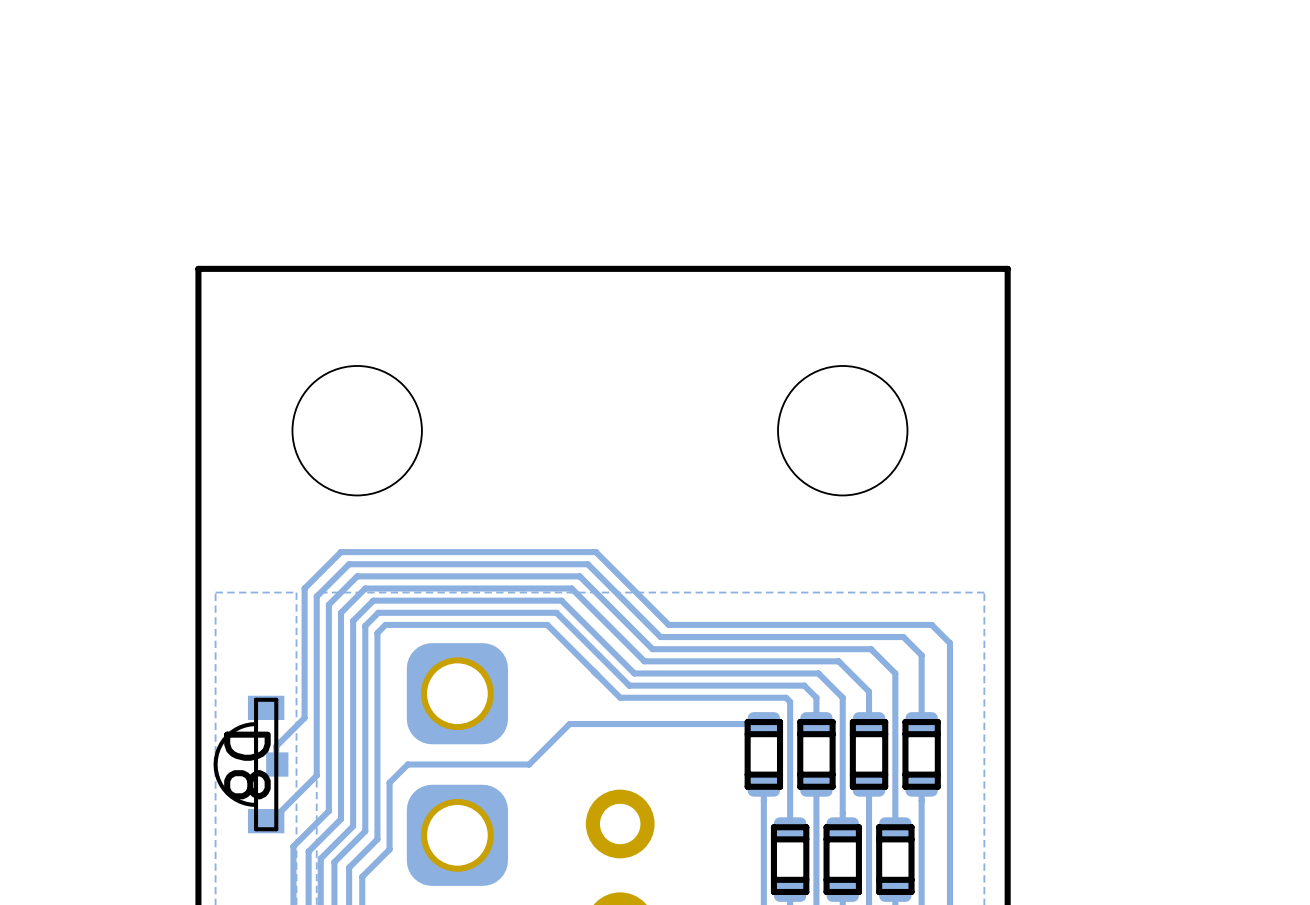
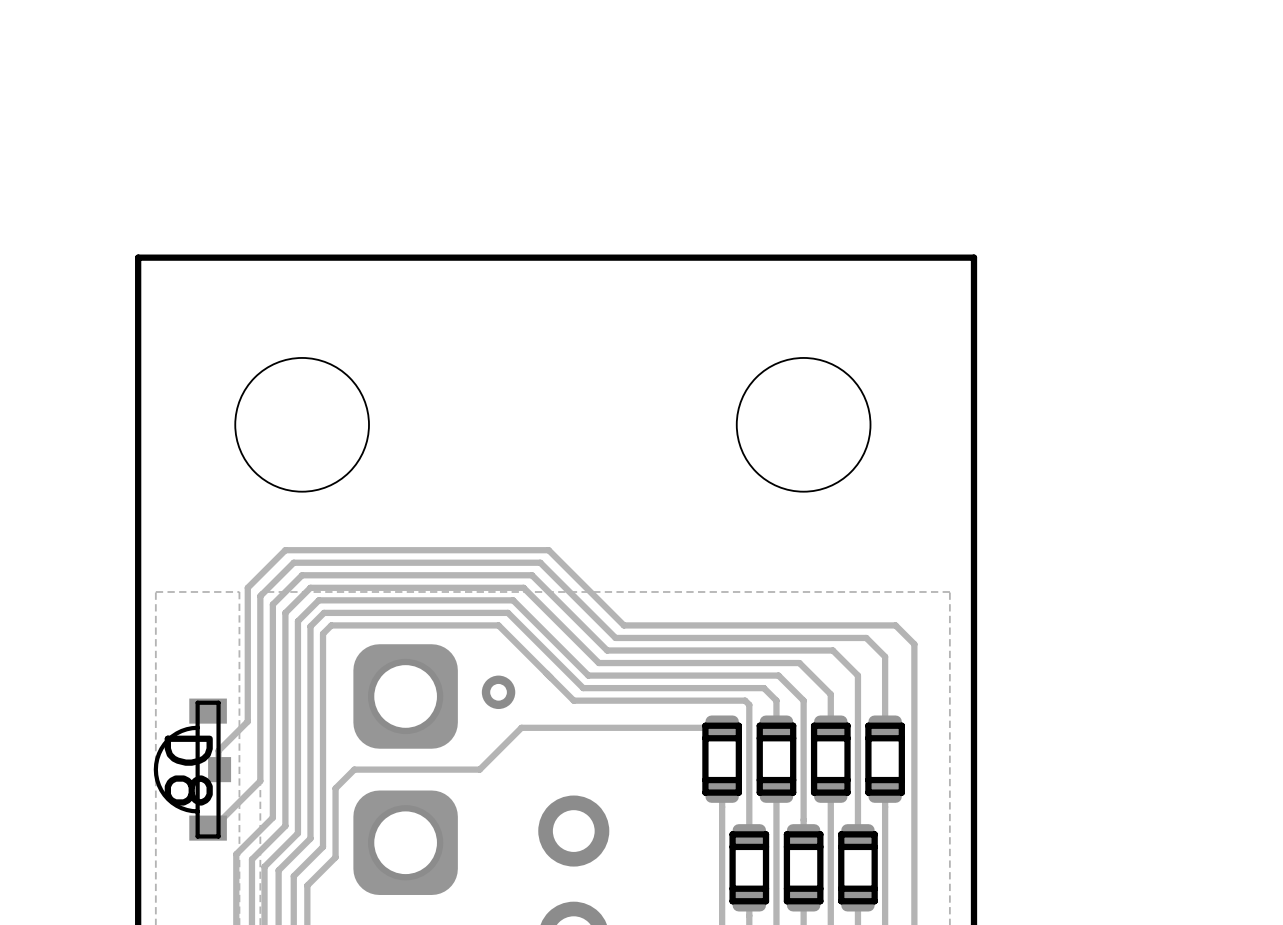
via: none -> (498, 692)

